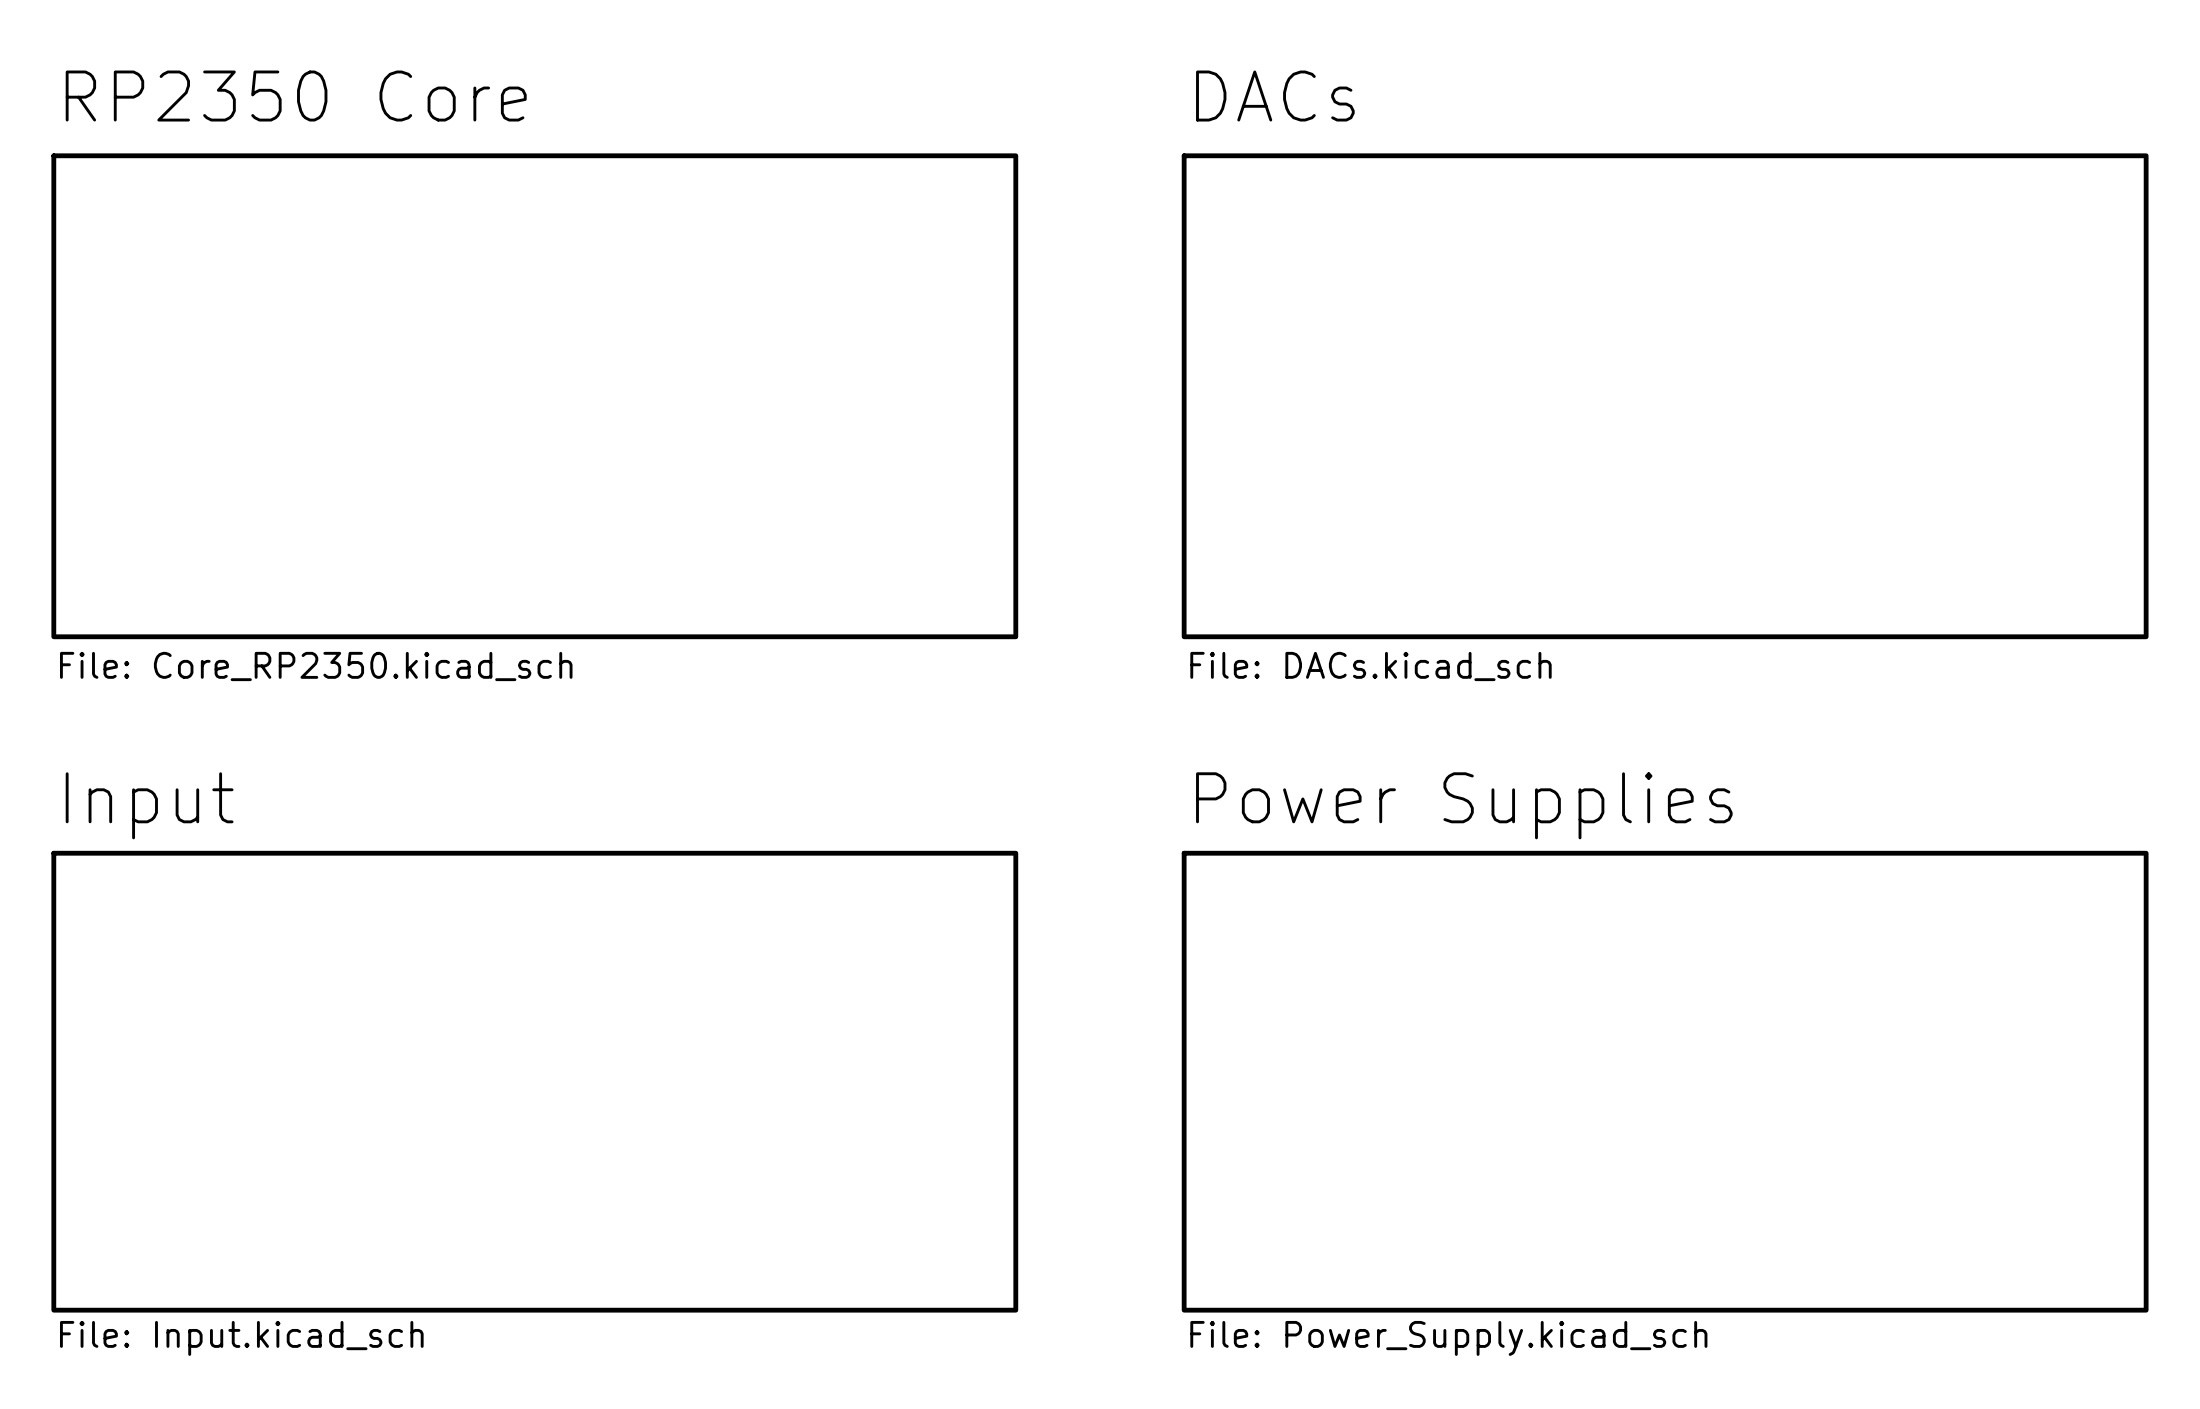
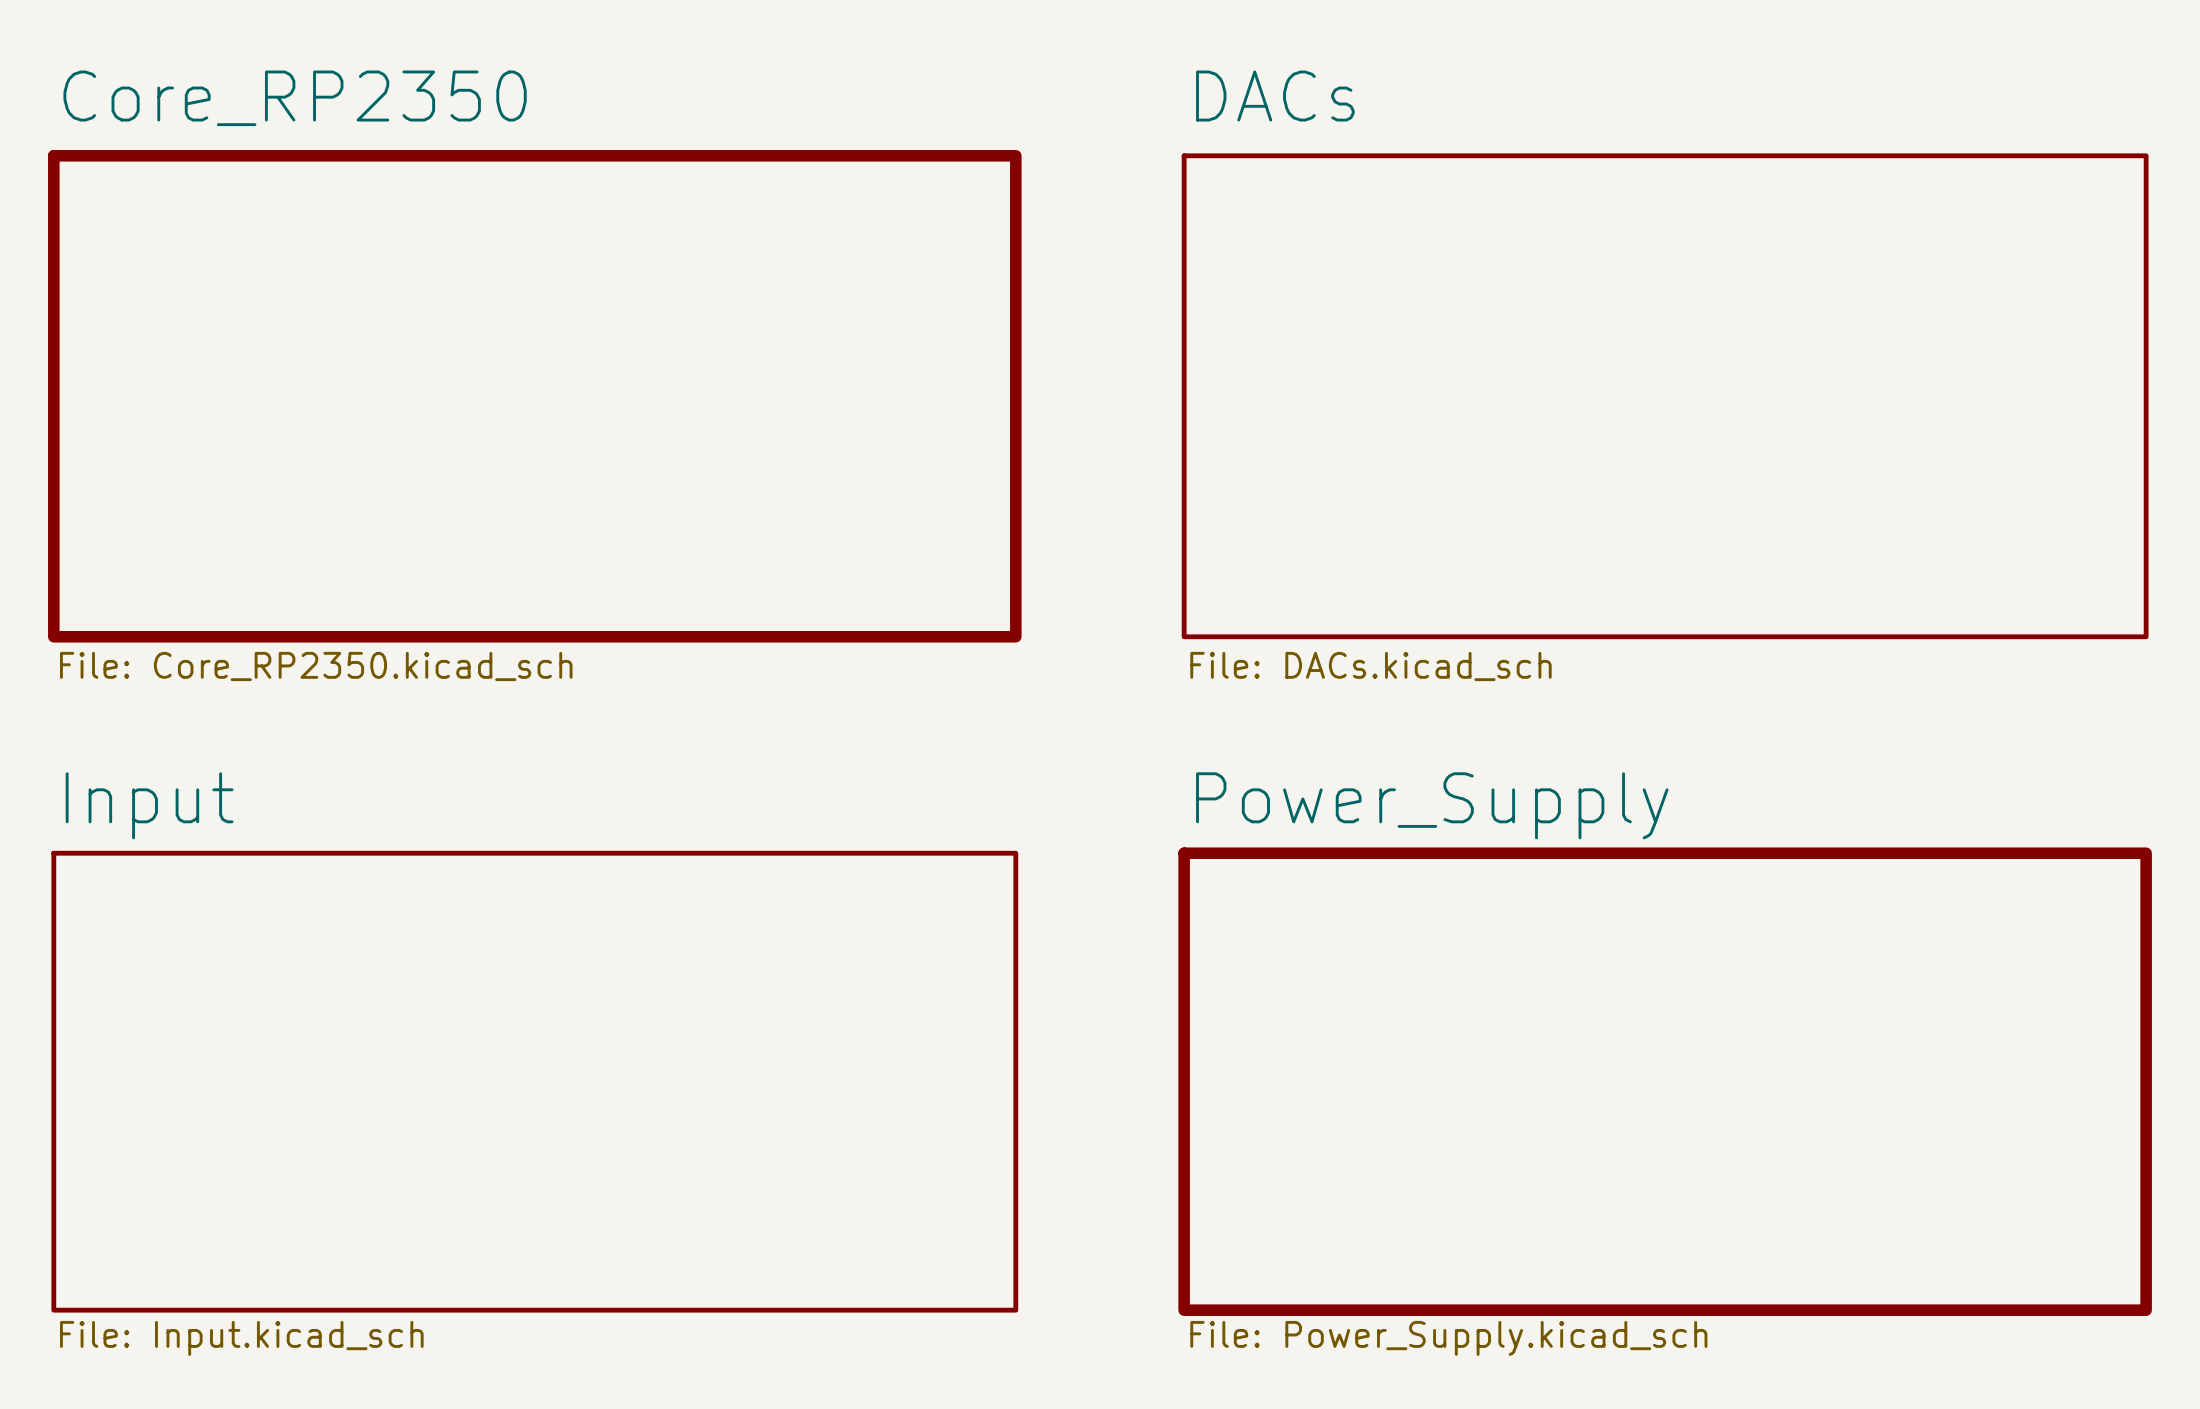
sheet RP2350 Core: File: Core_RP2350.kicad_sch (534, 396) -> none
sheet Core_RP2350: none -> File: Core_RP2350.kicad_sch (534, 396)
sheet Power Supplies: File: Power_Supply.kicad_sch (1665, 1081) -> none
sheet Power_Supply: none -> File: Power_Supply.kicad_sch (1665, 1081)

